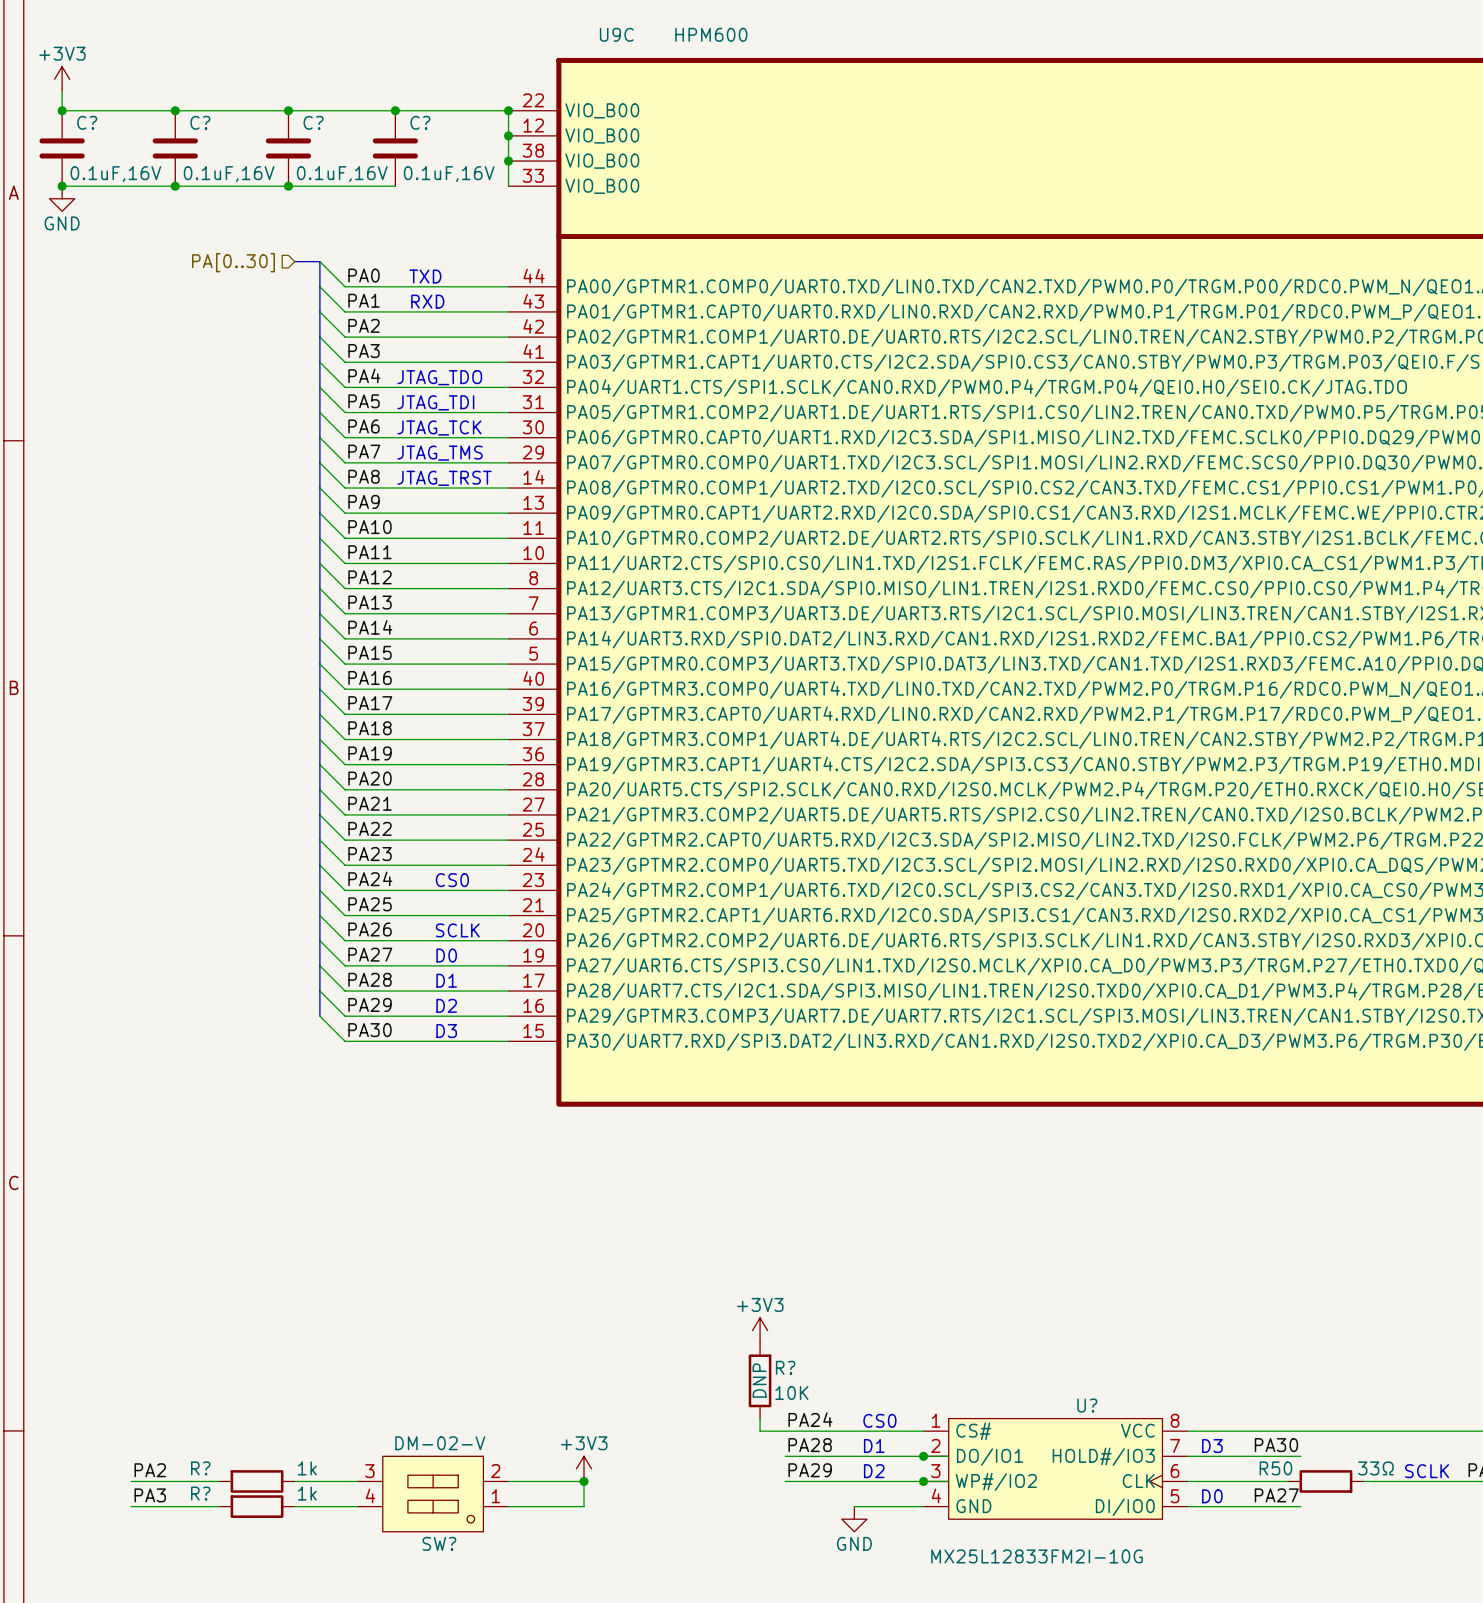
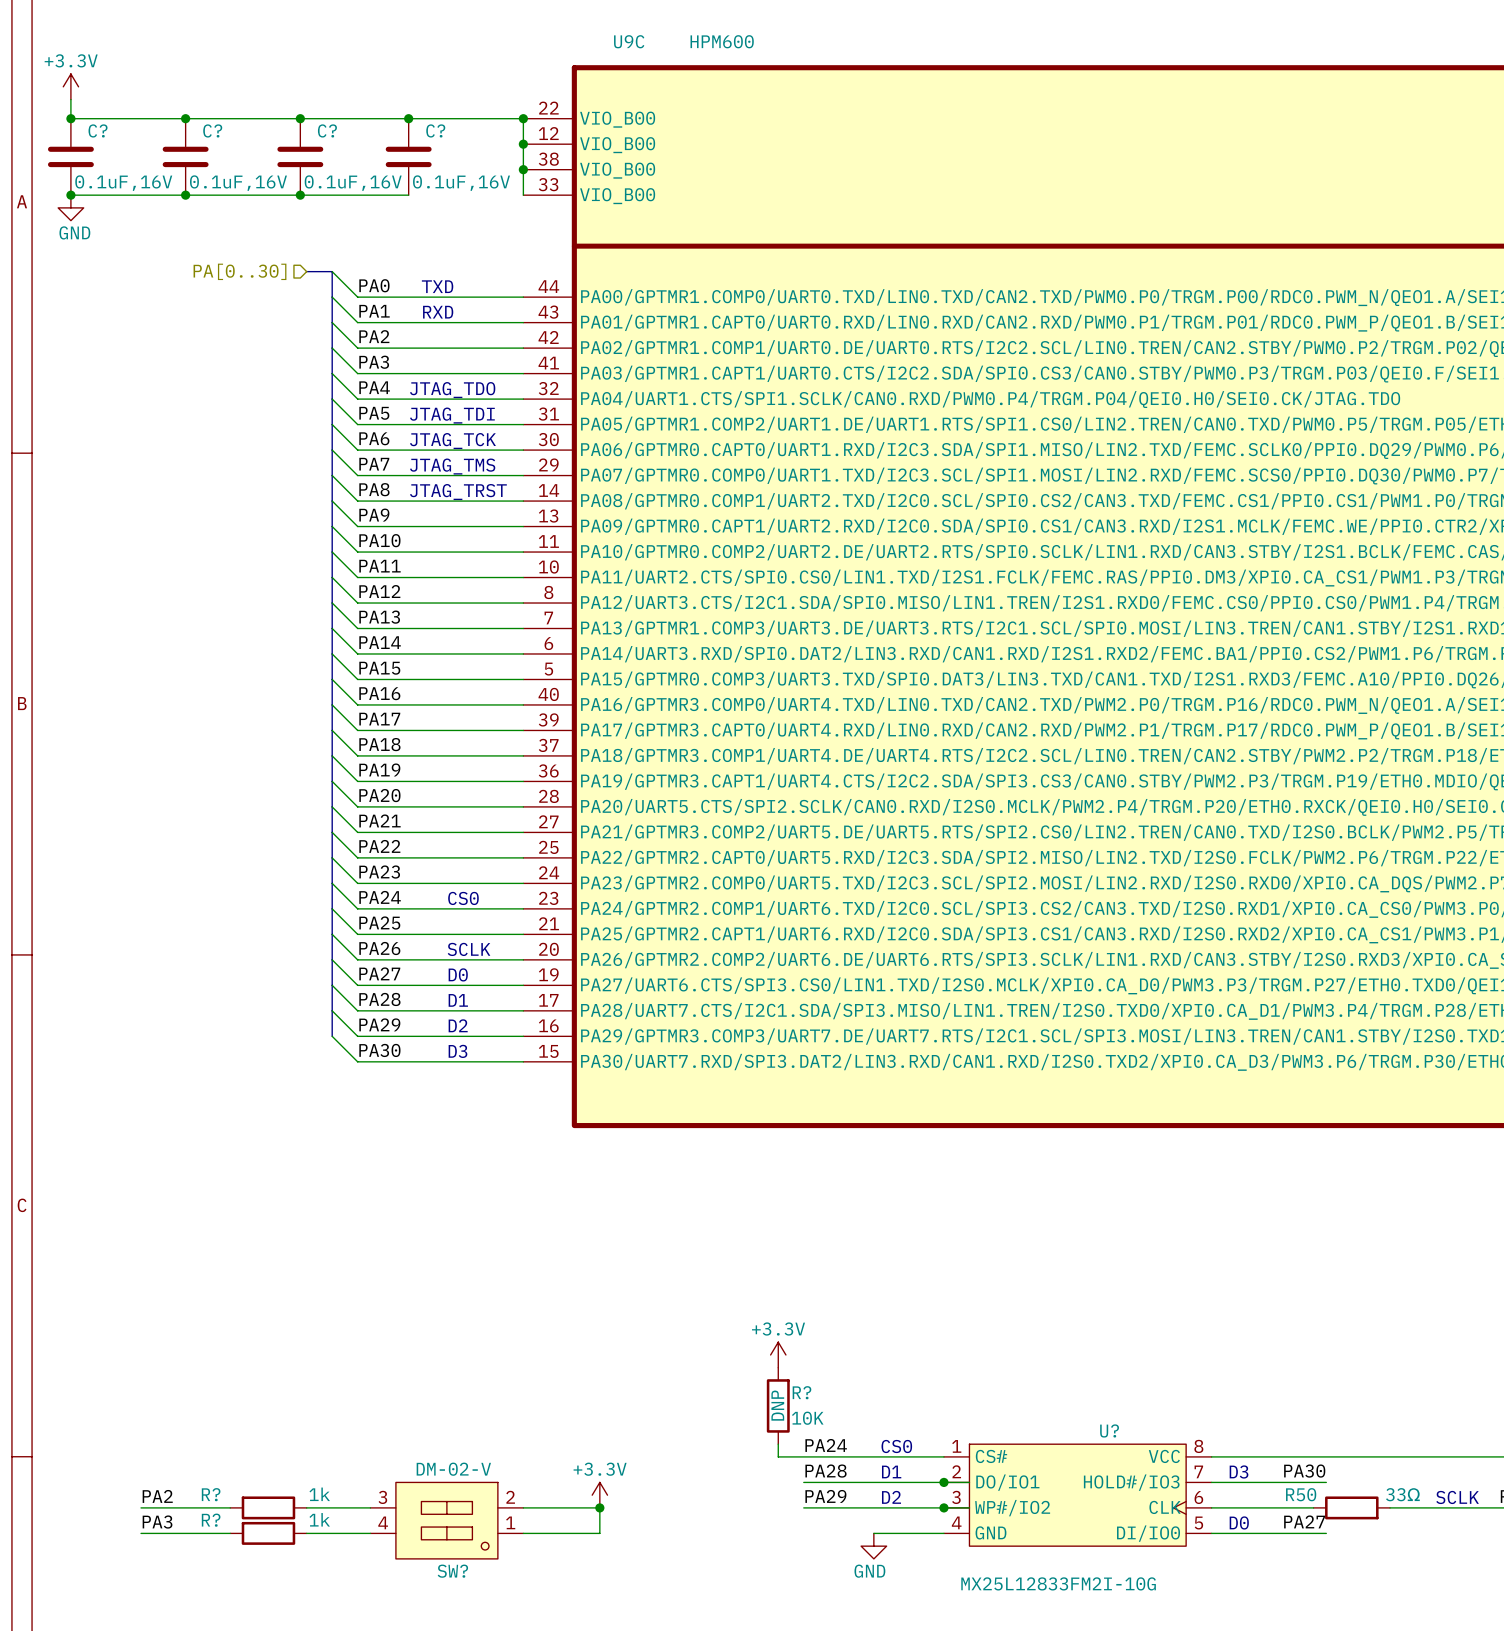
power symbol: +3V3 (62, 79) -> +3.3V (70, 86)
power symbol: +3V3 (760, 1330) -> +3.3V (778, 1354)
power symbol: +3V3 (584, 1468) -> +3.3V (599, 1495)

